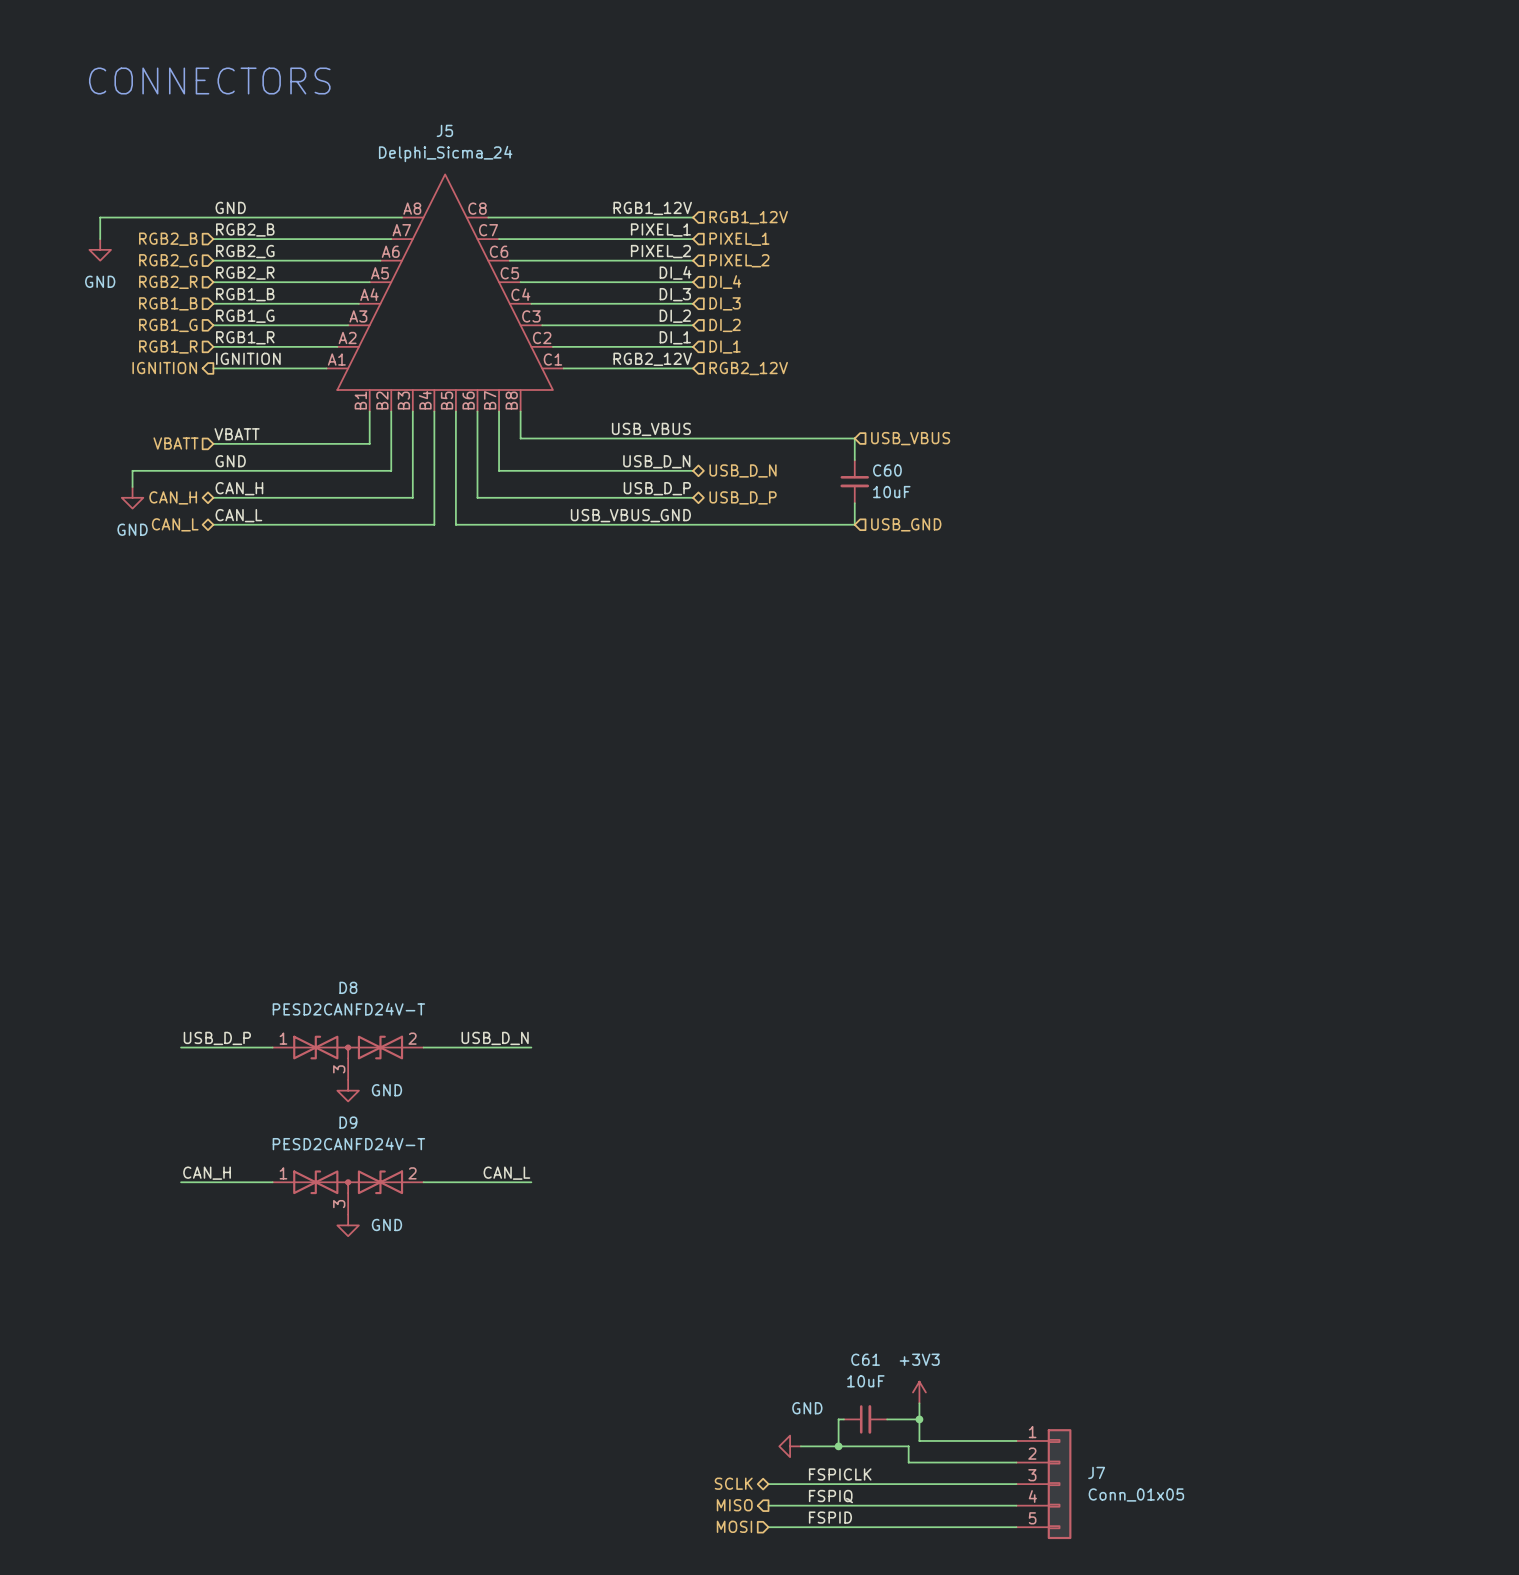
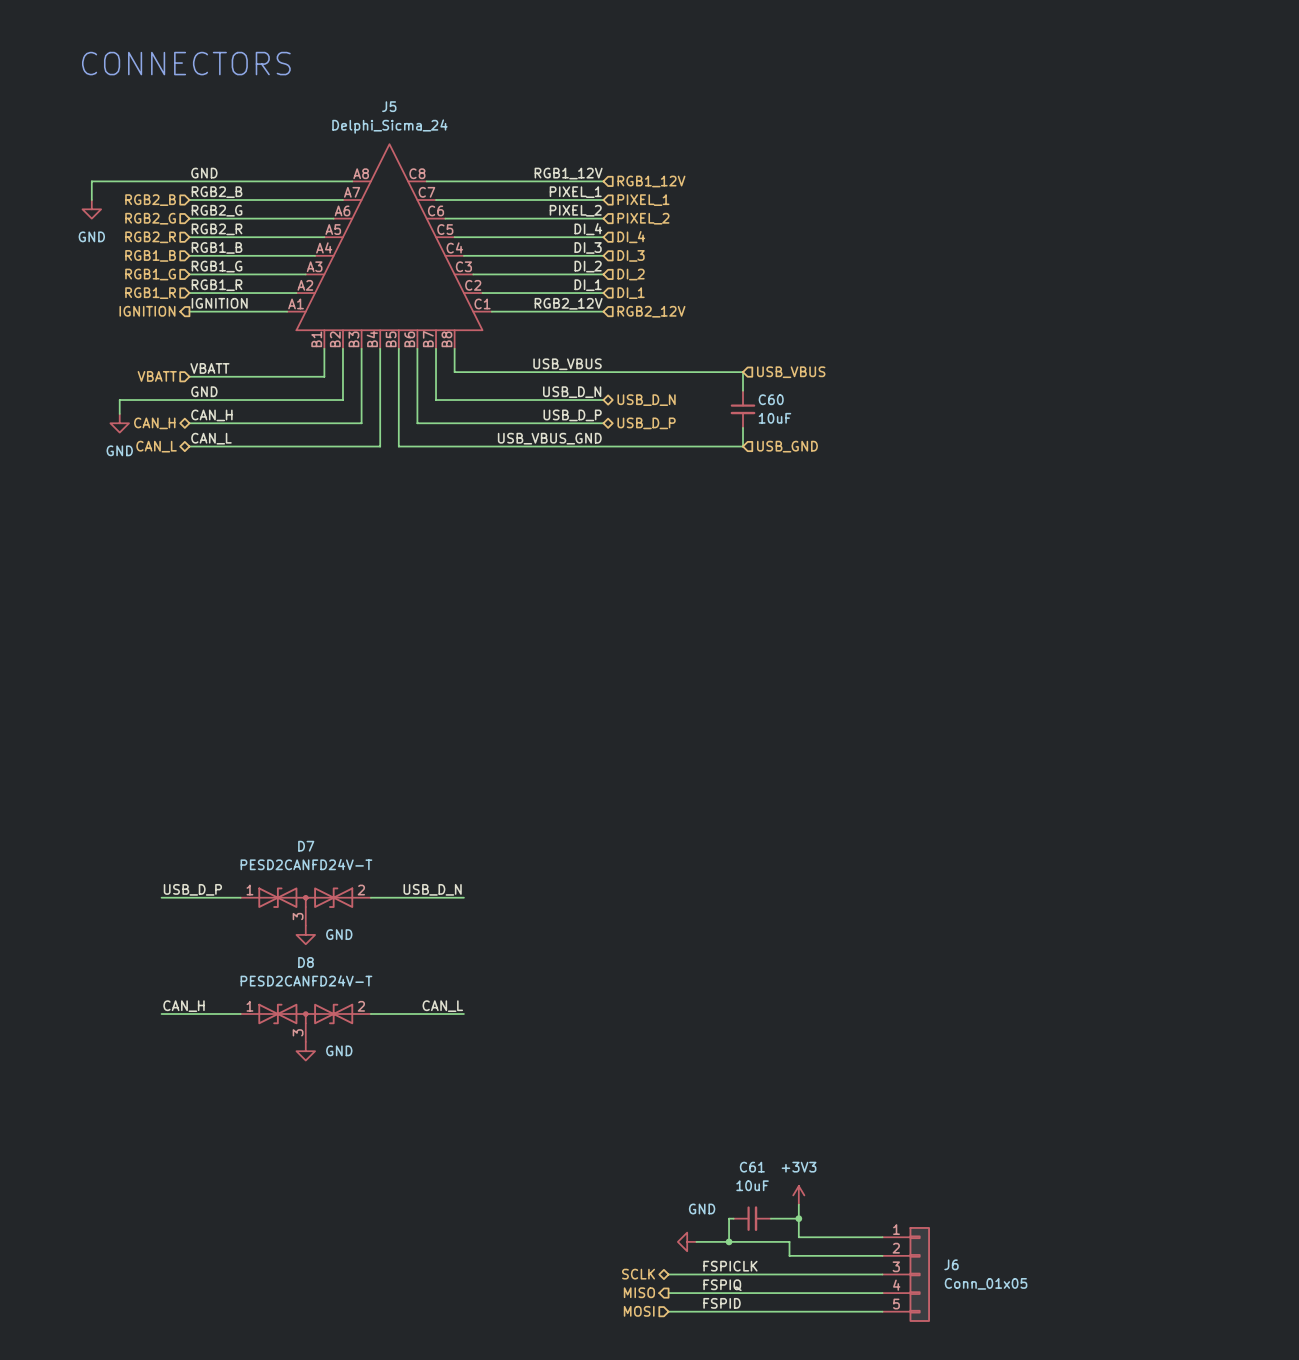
D8 name: D8 (348, 987) -> D7 (306, 846)
D9 name: D9 (348, 1122) -> D8 (305, 962)
J7 name: J7 (1096, 1472) -> J6 (951, 1264)

